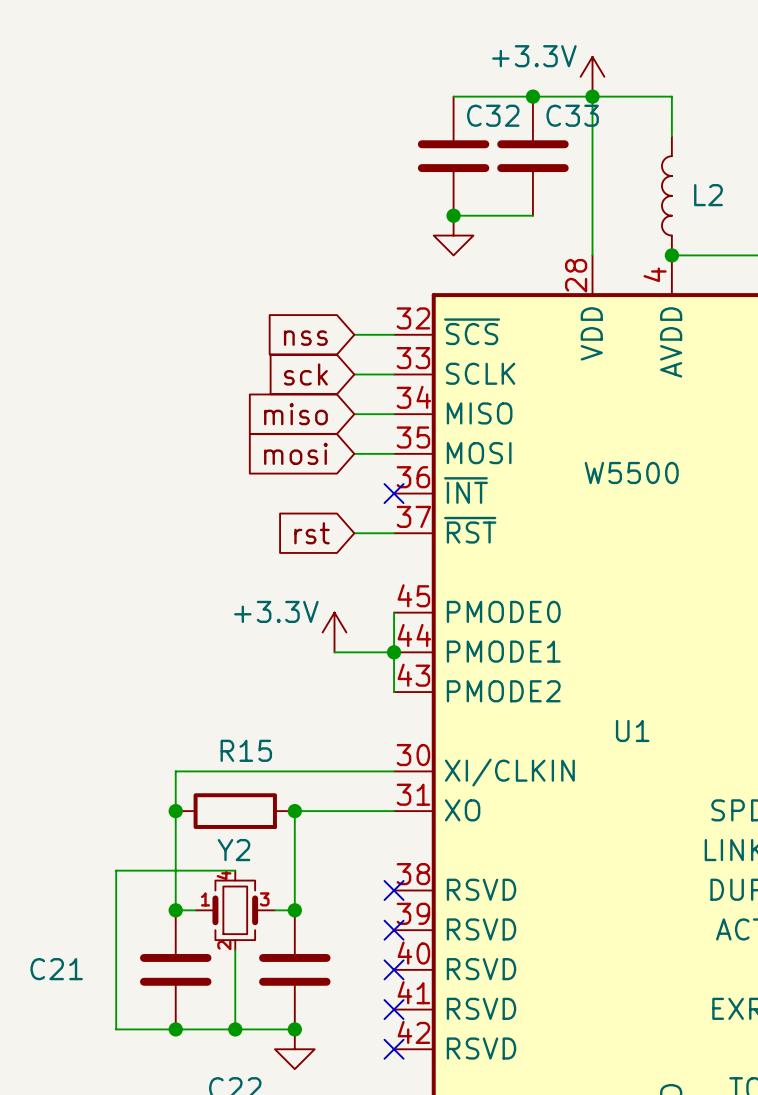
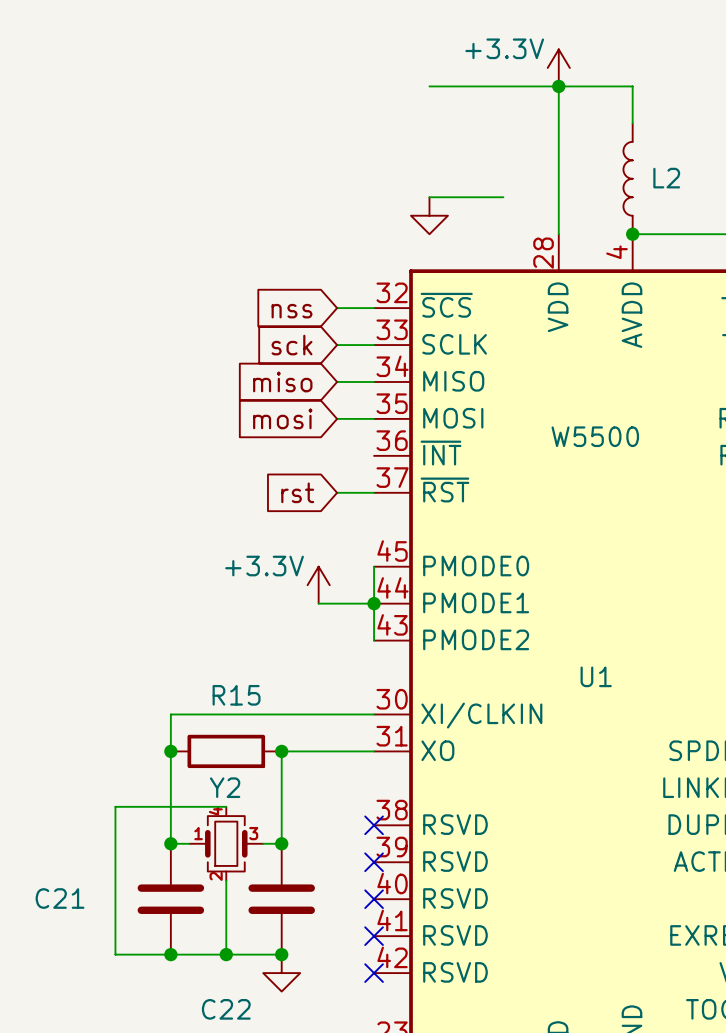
junction: (532, 96) -> none
C32: (453, 156) -> none
C33: (532, 156) -> none
junction: (453, 215) -> none
no-connect mark: (394, 493) -> none

